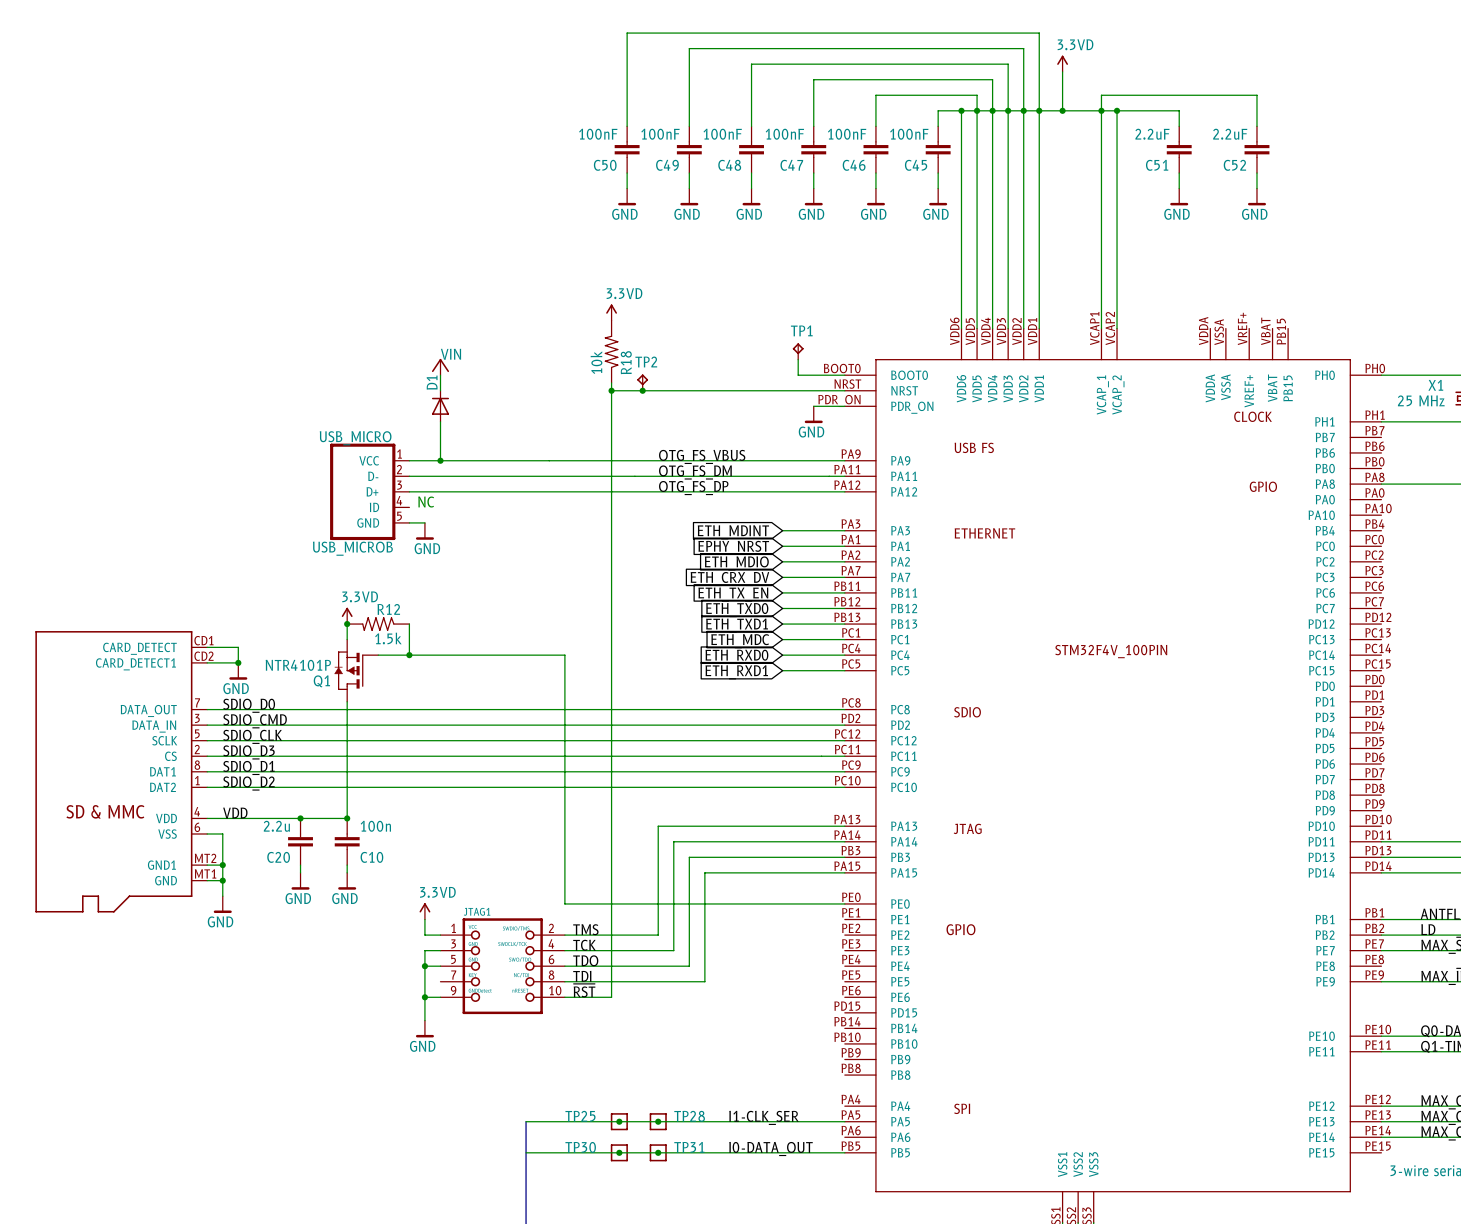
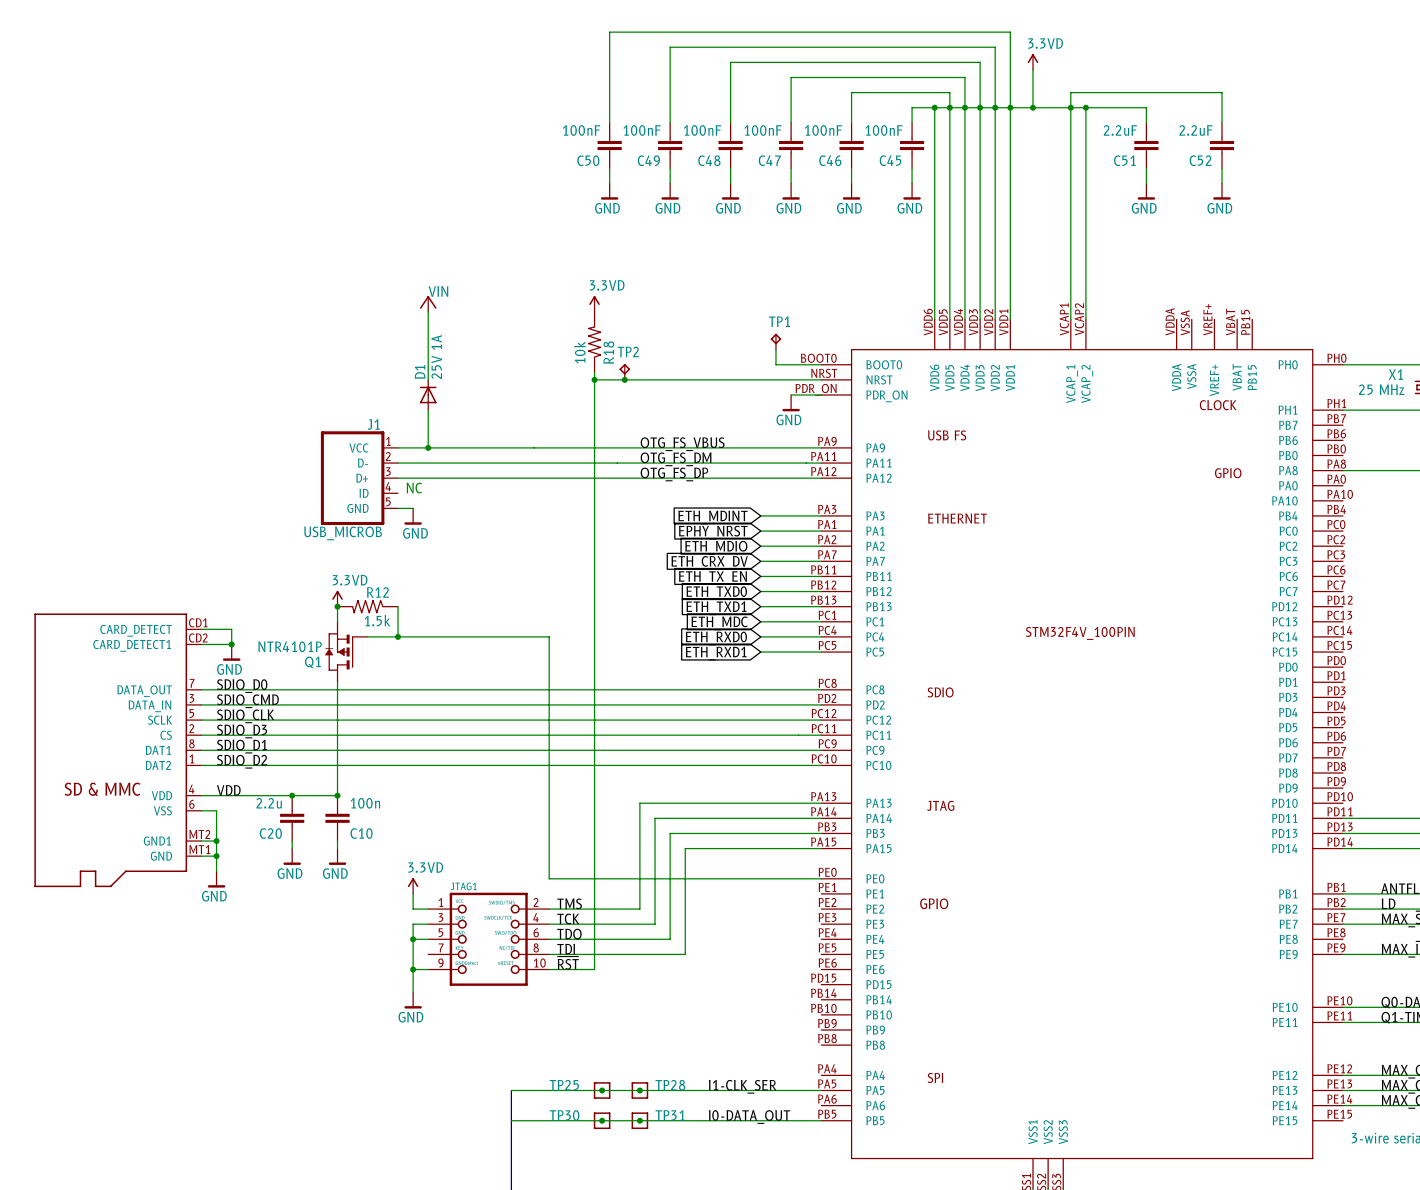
wire: none -> (428, 311) (428, 364)
power symbol position: VIN (440, 367) -> VIN (428, 303)
D1 value: none -> 25V 1A (436, 357)
USB_MICRO name: USB_MICRO (355, 438) -> J1 (373, 424)

